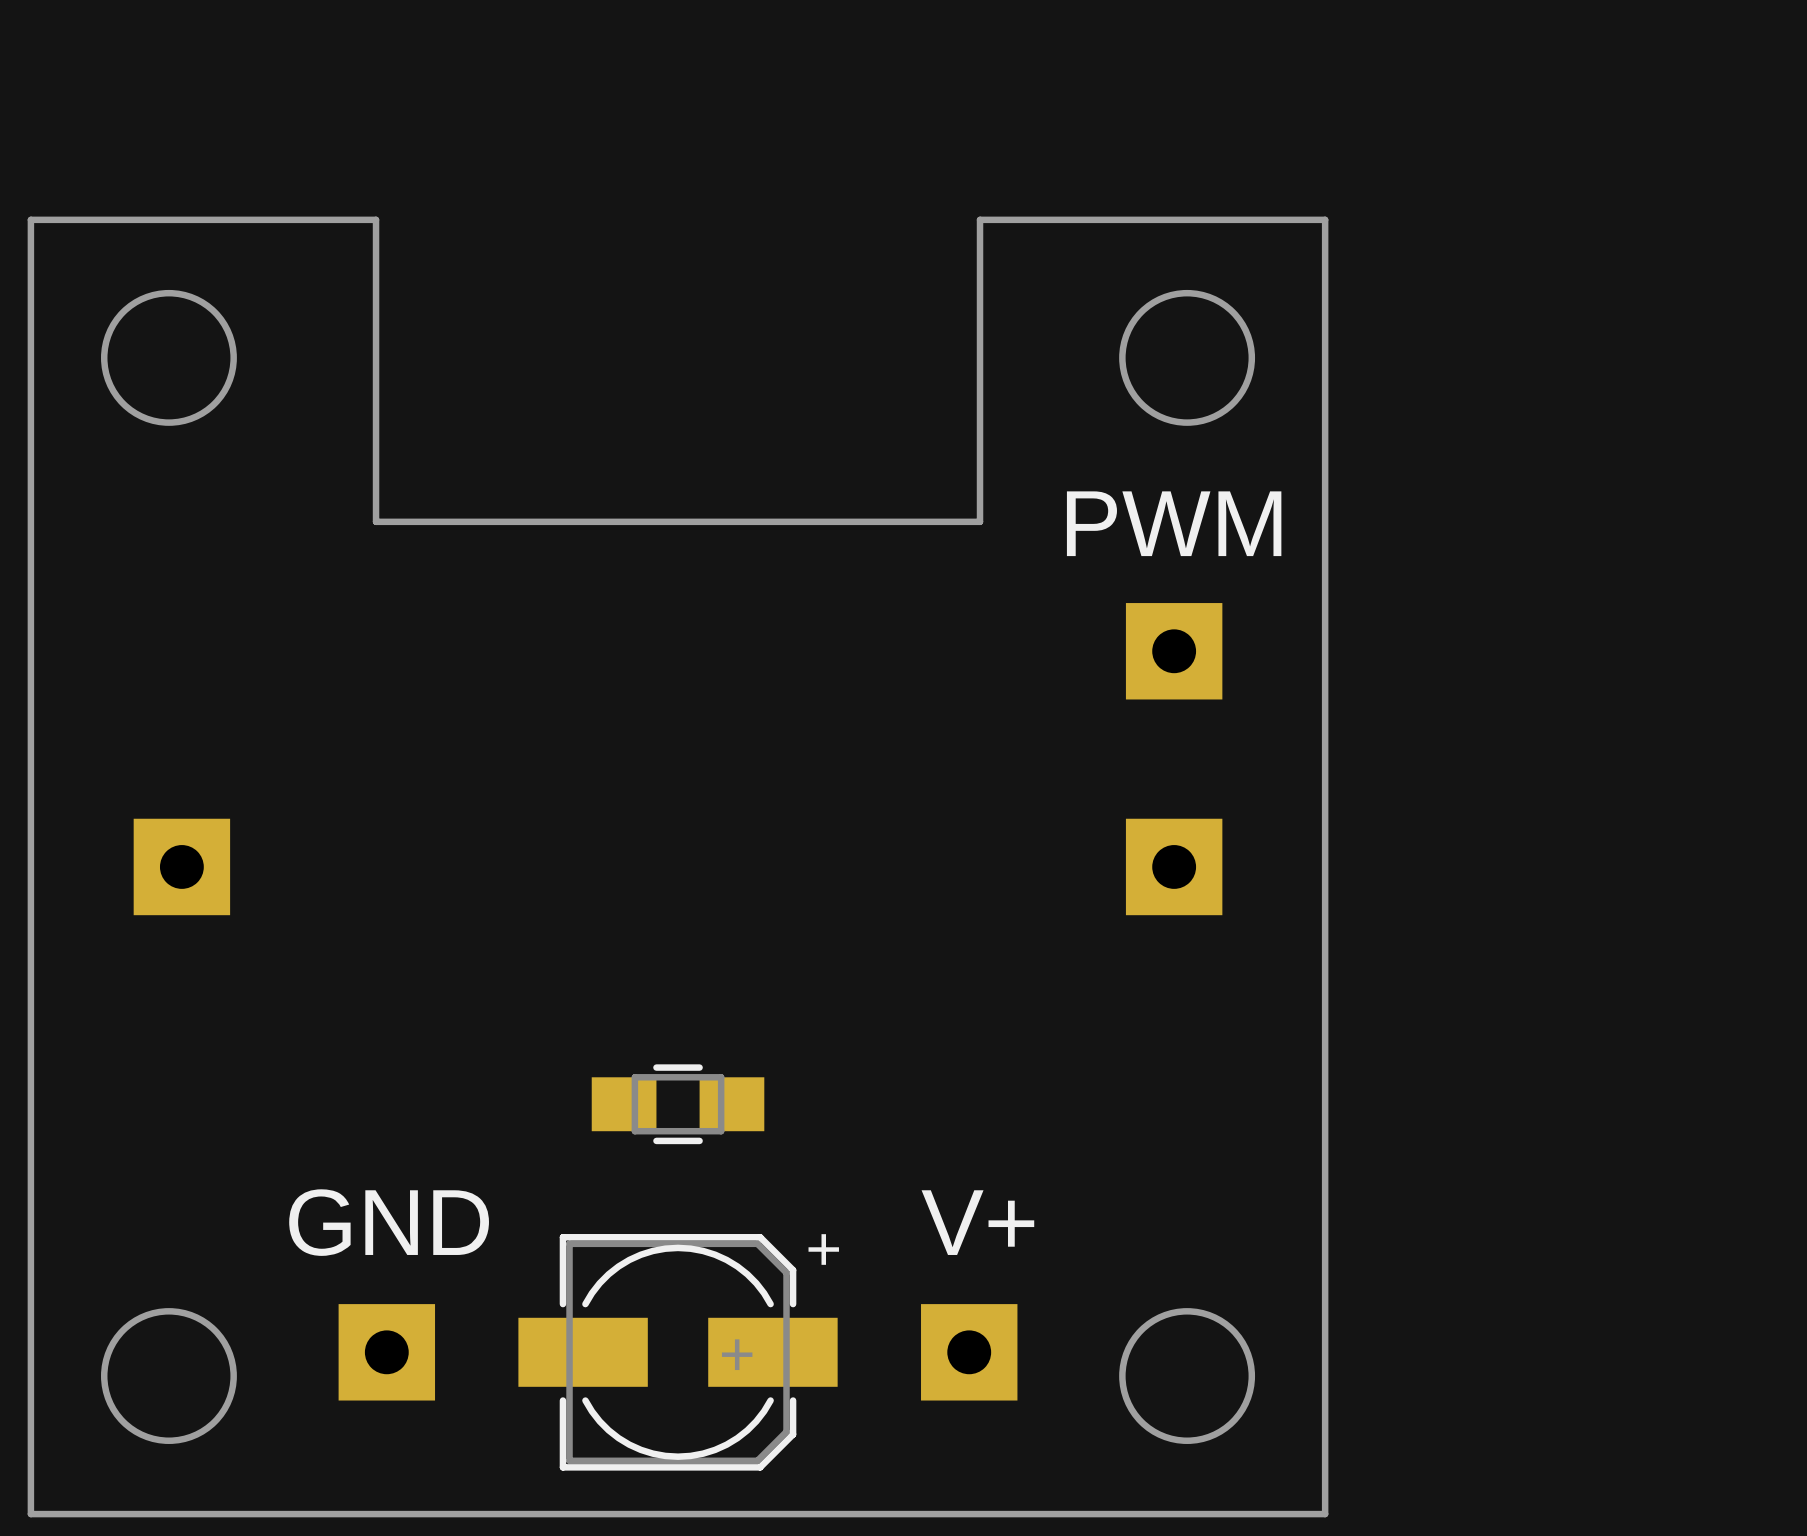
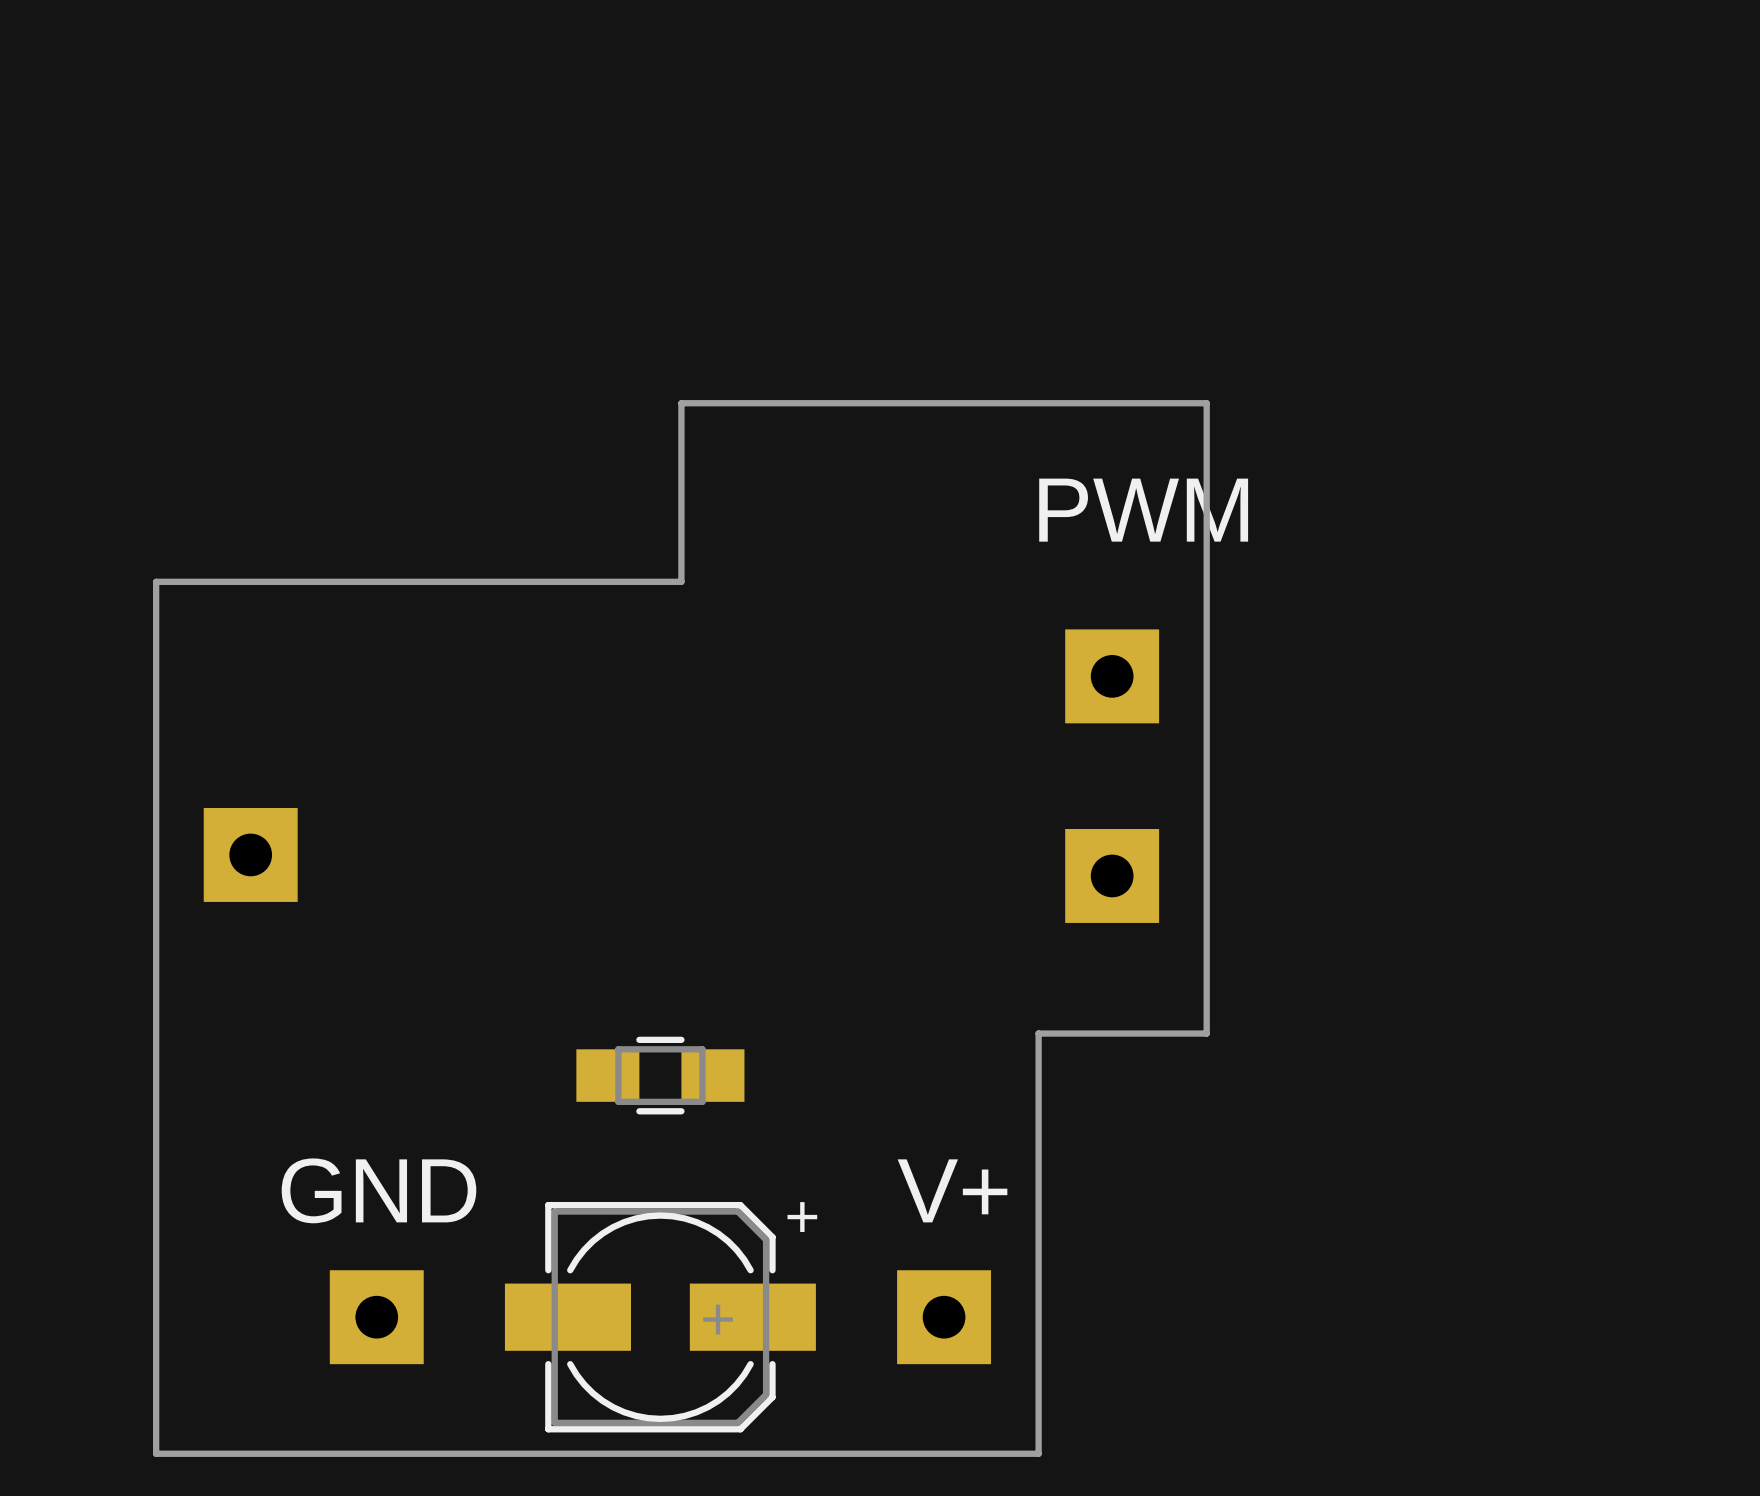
board edge: (1325, 219) (980, 219) (980, 521) (376, 521) (376, 219) (30, 219) (30, 1514) (1325, 1514) (1325, 219) -> (1206, 403) (1206, 1033) (1038, 1033) (1038, 1453) (156, 1453) (156, 581) (681, 581) (681, 403) (1206, 403)
round board edge: [101, 289, 237, 426] -> none
round board edge: [1119, 289, 1256, 426] -> none
part position: (1174, 651) -> (1112, 676)
part position: (181, 866) -> (250, 854)
part position: (1174, 866) -> (1112, 875)
round board edge: [101, 1308, 237, 1444] -> none
round board edge: [1119, 1308, 1256, 1444] -> none

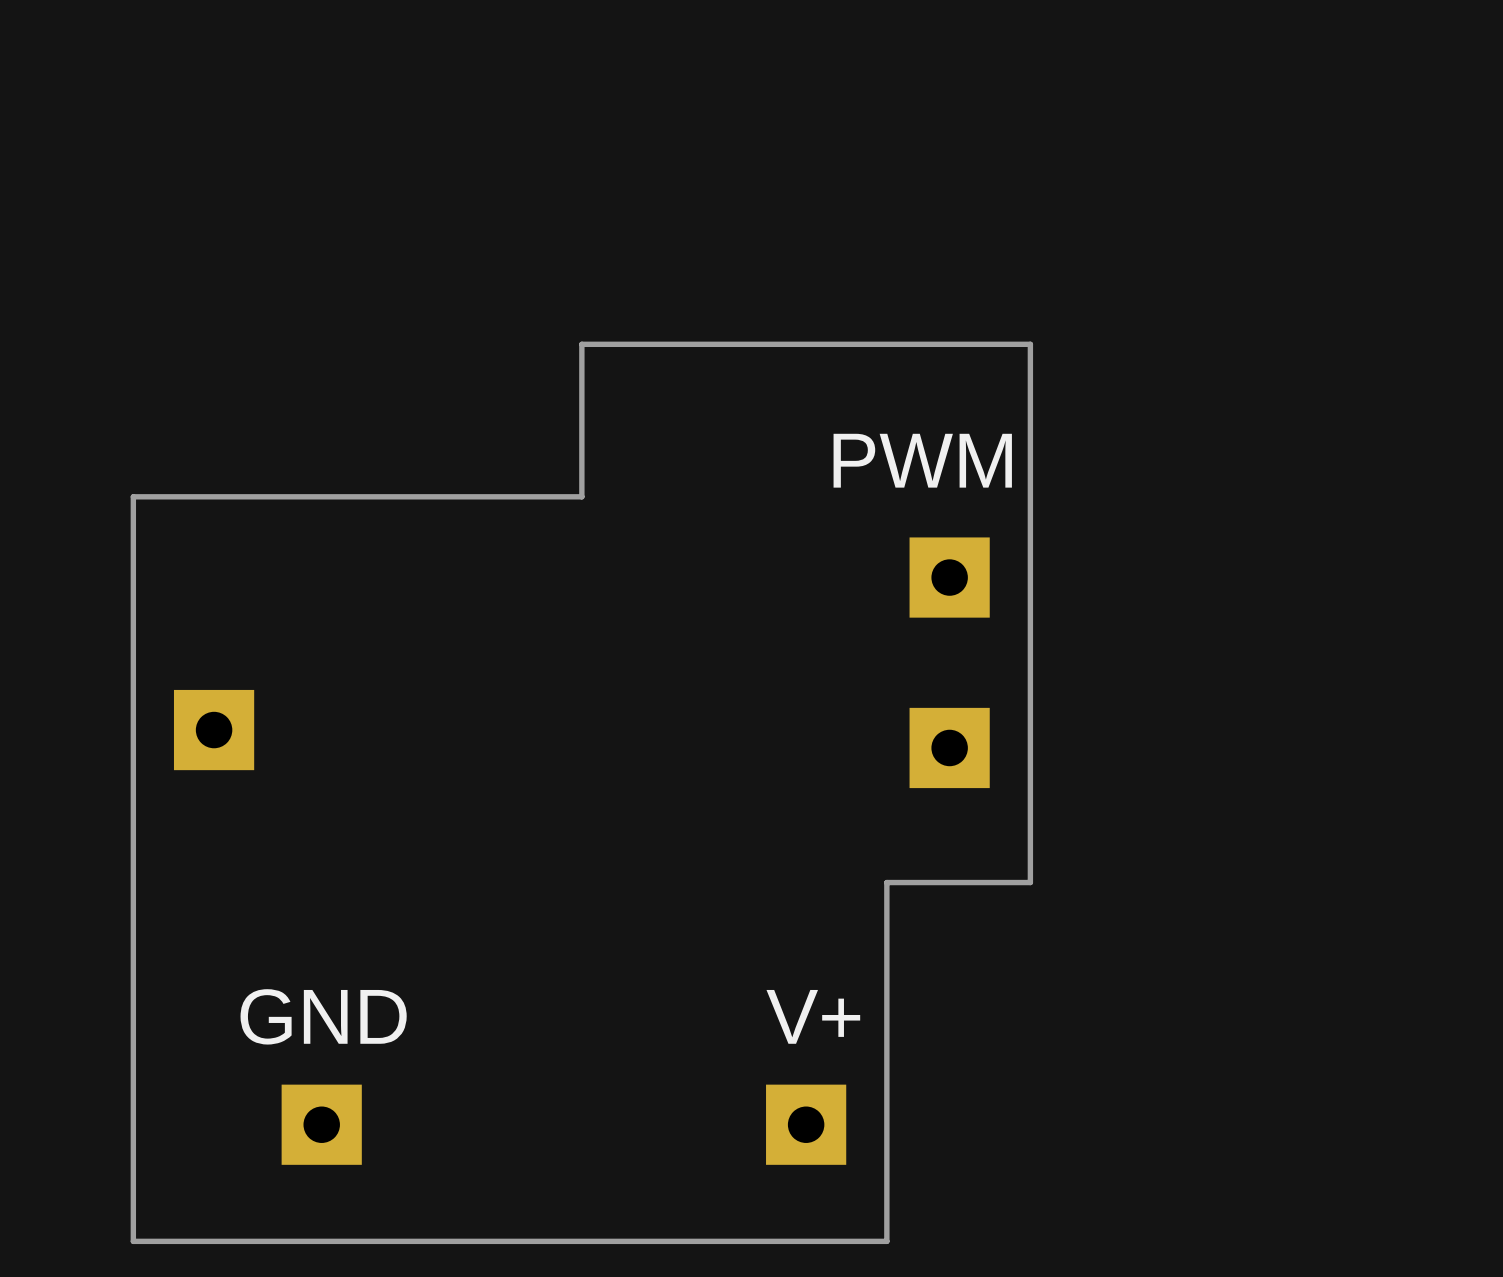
text position: PWM (1143, 510) -> PWM (922, 460)
part: (660, 1075) -> none
part: (660, 1317) -> none

